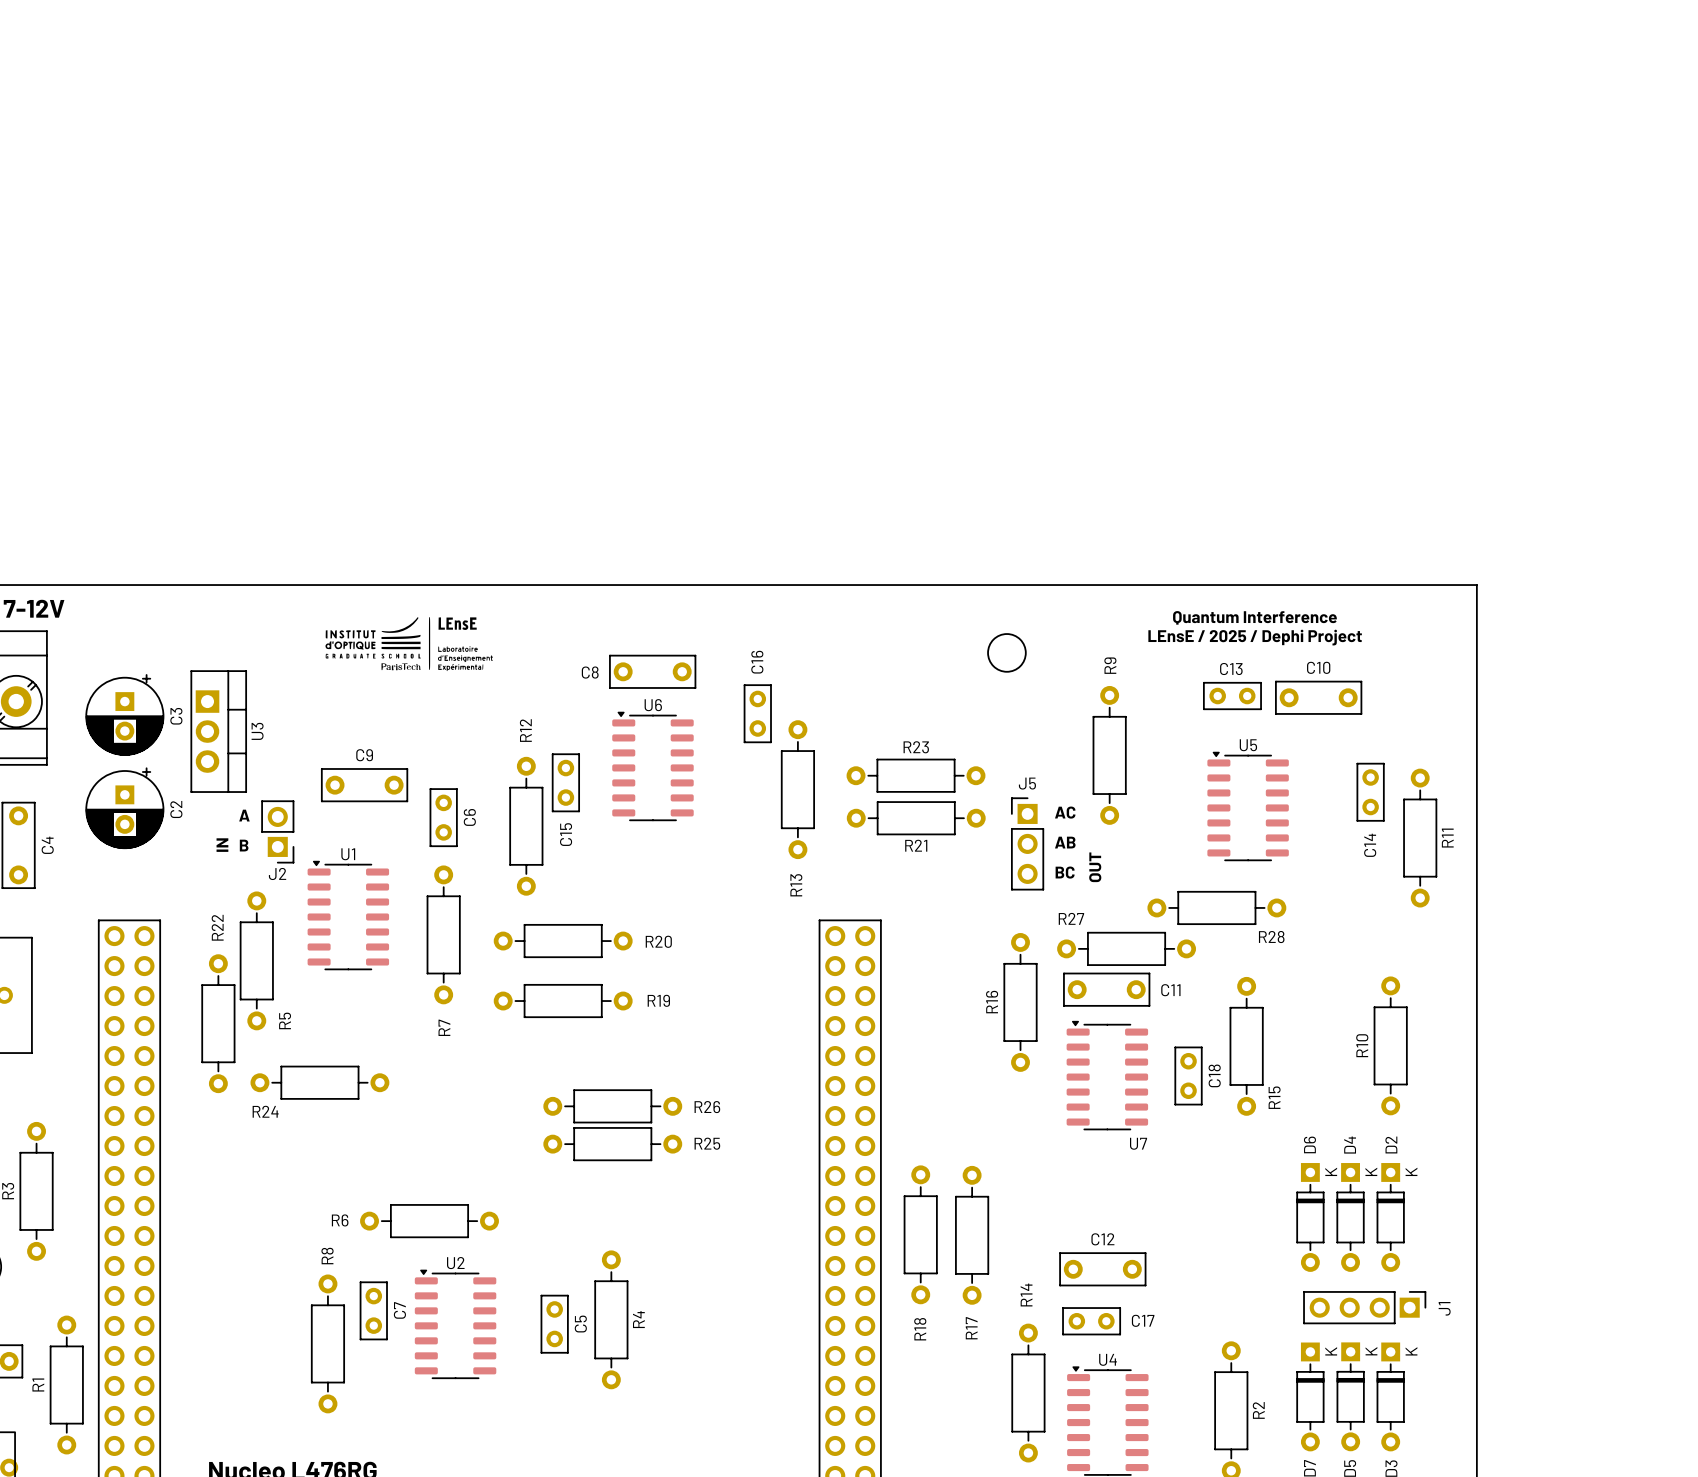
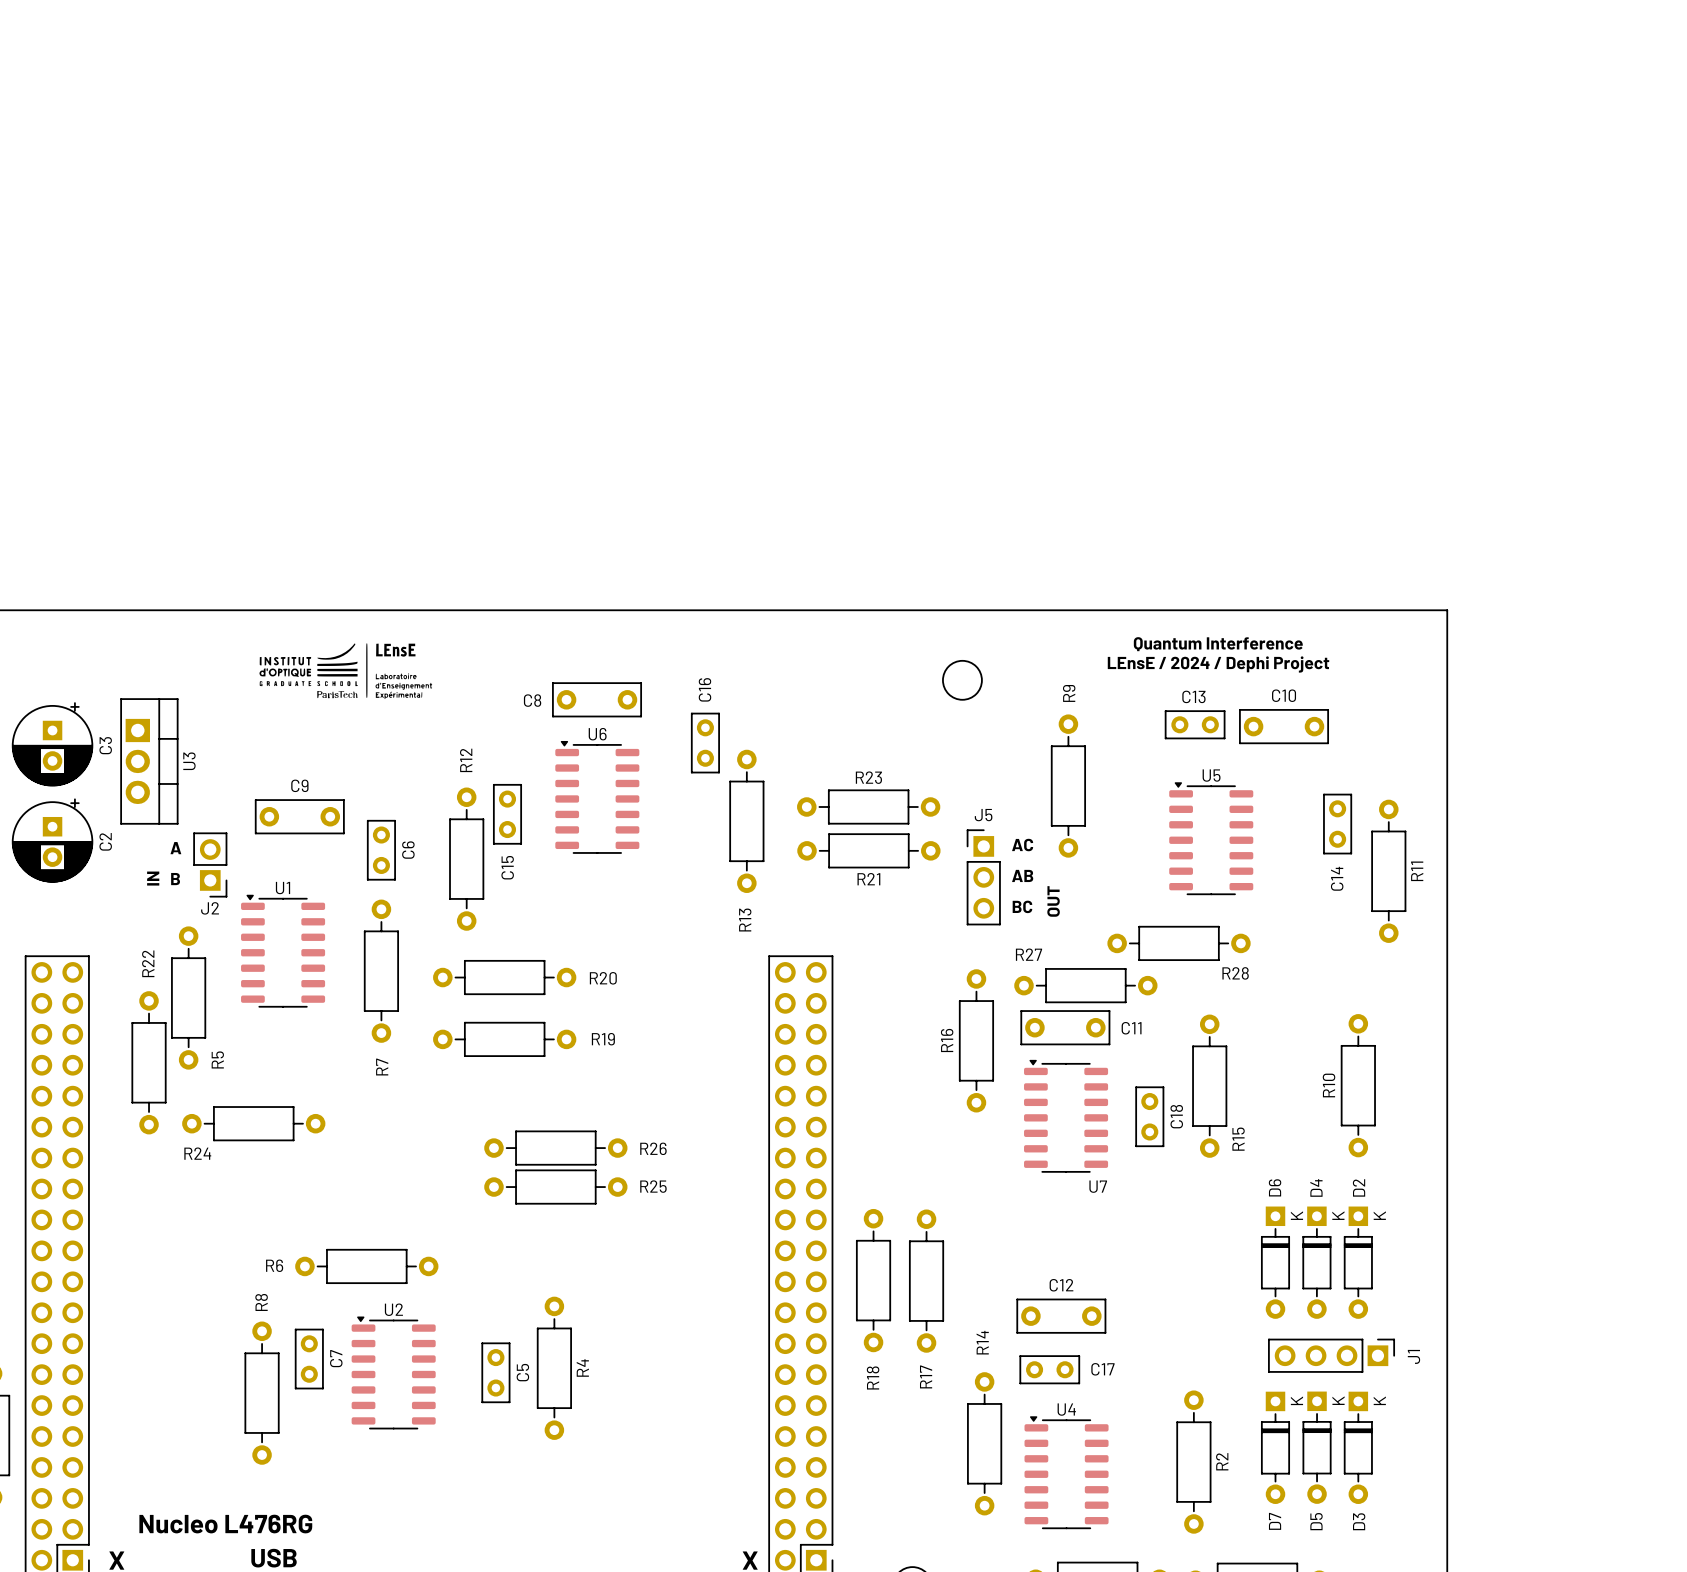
text: LEnsE / 2025 / Dephi Project (1255, 637) -> LEnsE / 2024 / Dephi Project (1218, 664)

